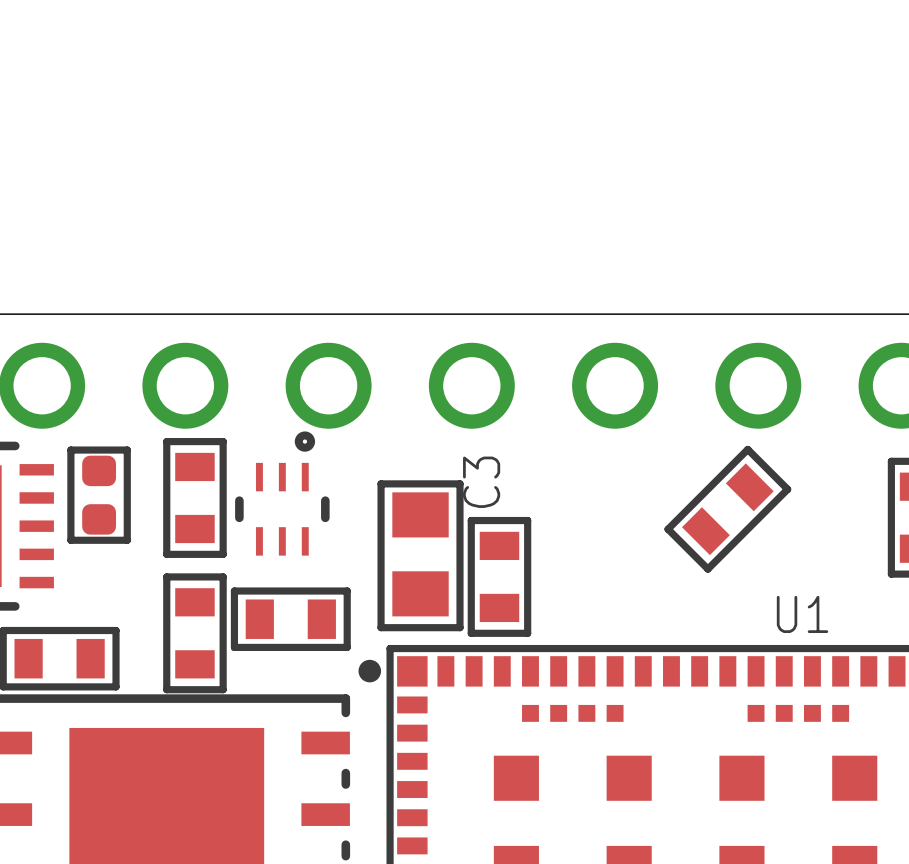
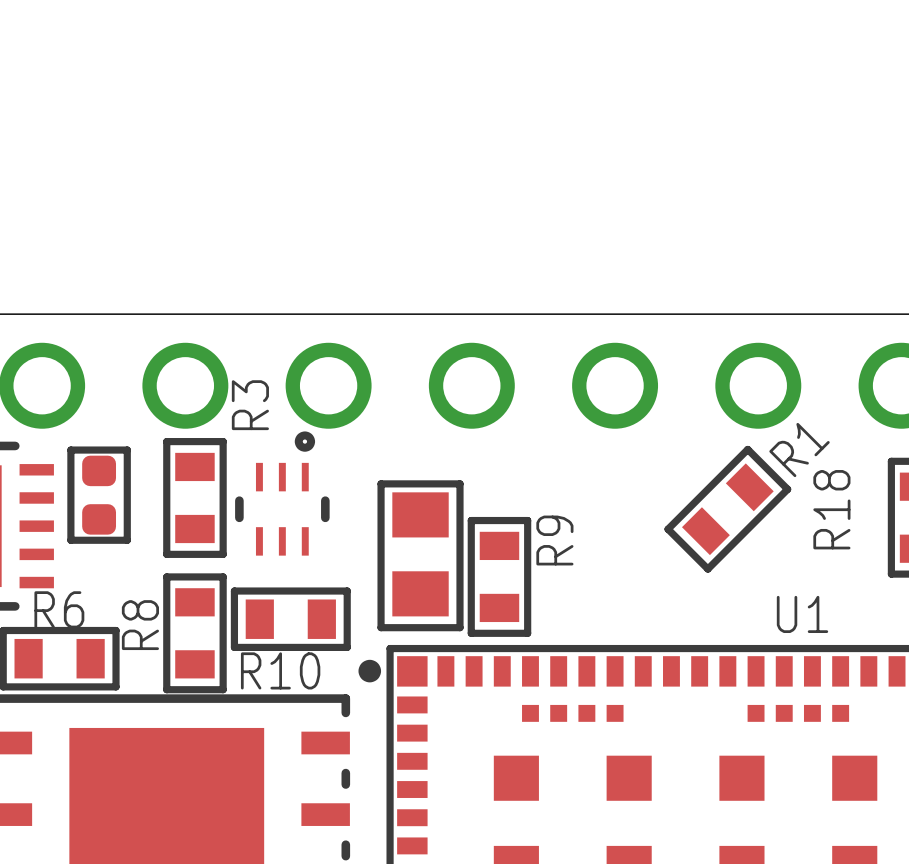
R3 name: none -> R3 (250, 405)
R1 name: none -> R1 (799, 450)
C3 name: C3 (481, 482) -> none
R18 name: none -> R18 (831, 509)
R9 name: none -> R9 (554, 540)
R6 name: none -> R6 (59, 609)
R8 name: none -> R8 (140, 625)
R10 name: none -> R10 (280, 670)

